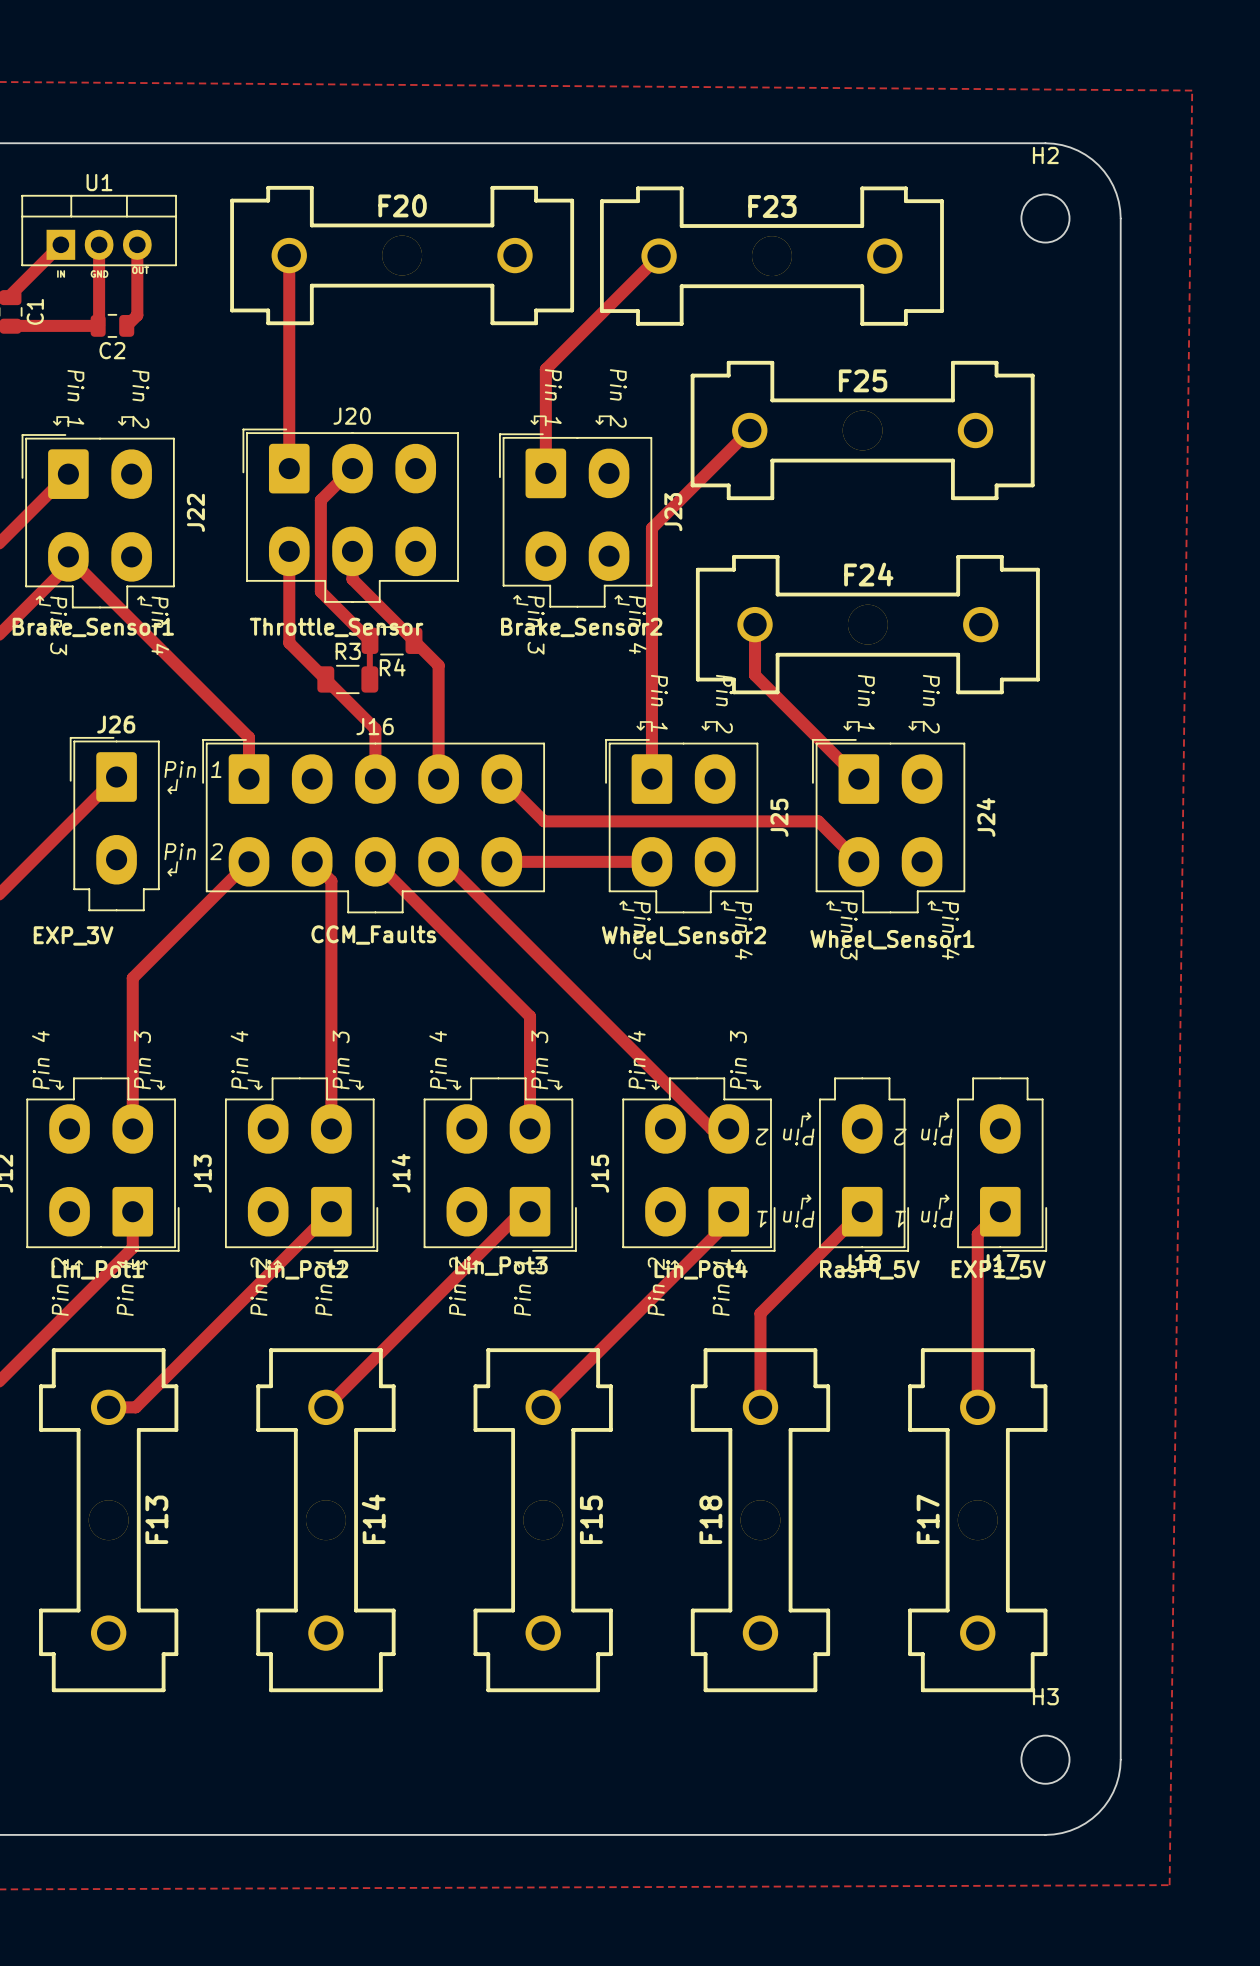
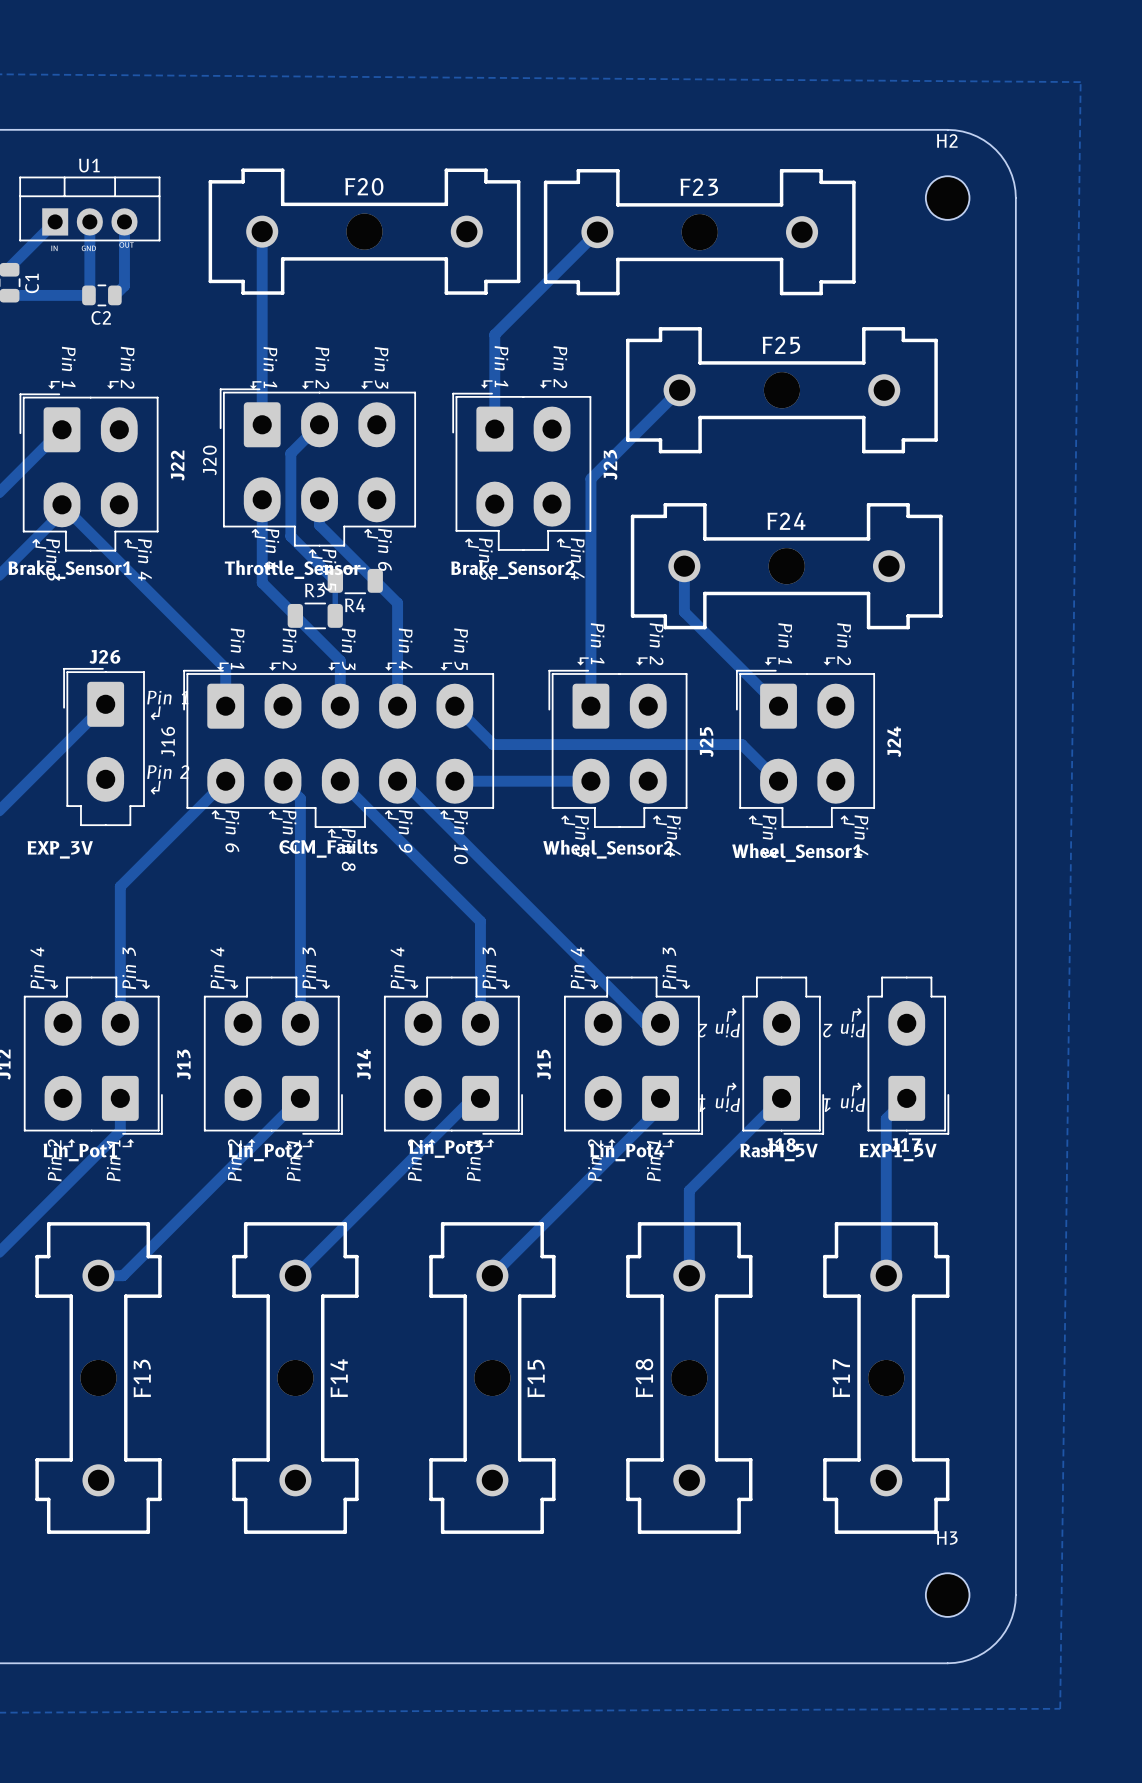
J20 name position: J20 (352, 416) -> J20 (209, 460)
J20 footprint: [242, 428, 459, 603] -> [219, 388, 416, 547]
J16 name position: J16 (375, 726) -> J16 (168, 741)
J16 footprint: [202, 739, 546, 914] -> [183, 669, 495, 828]

